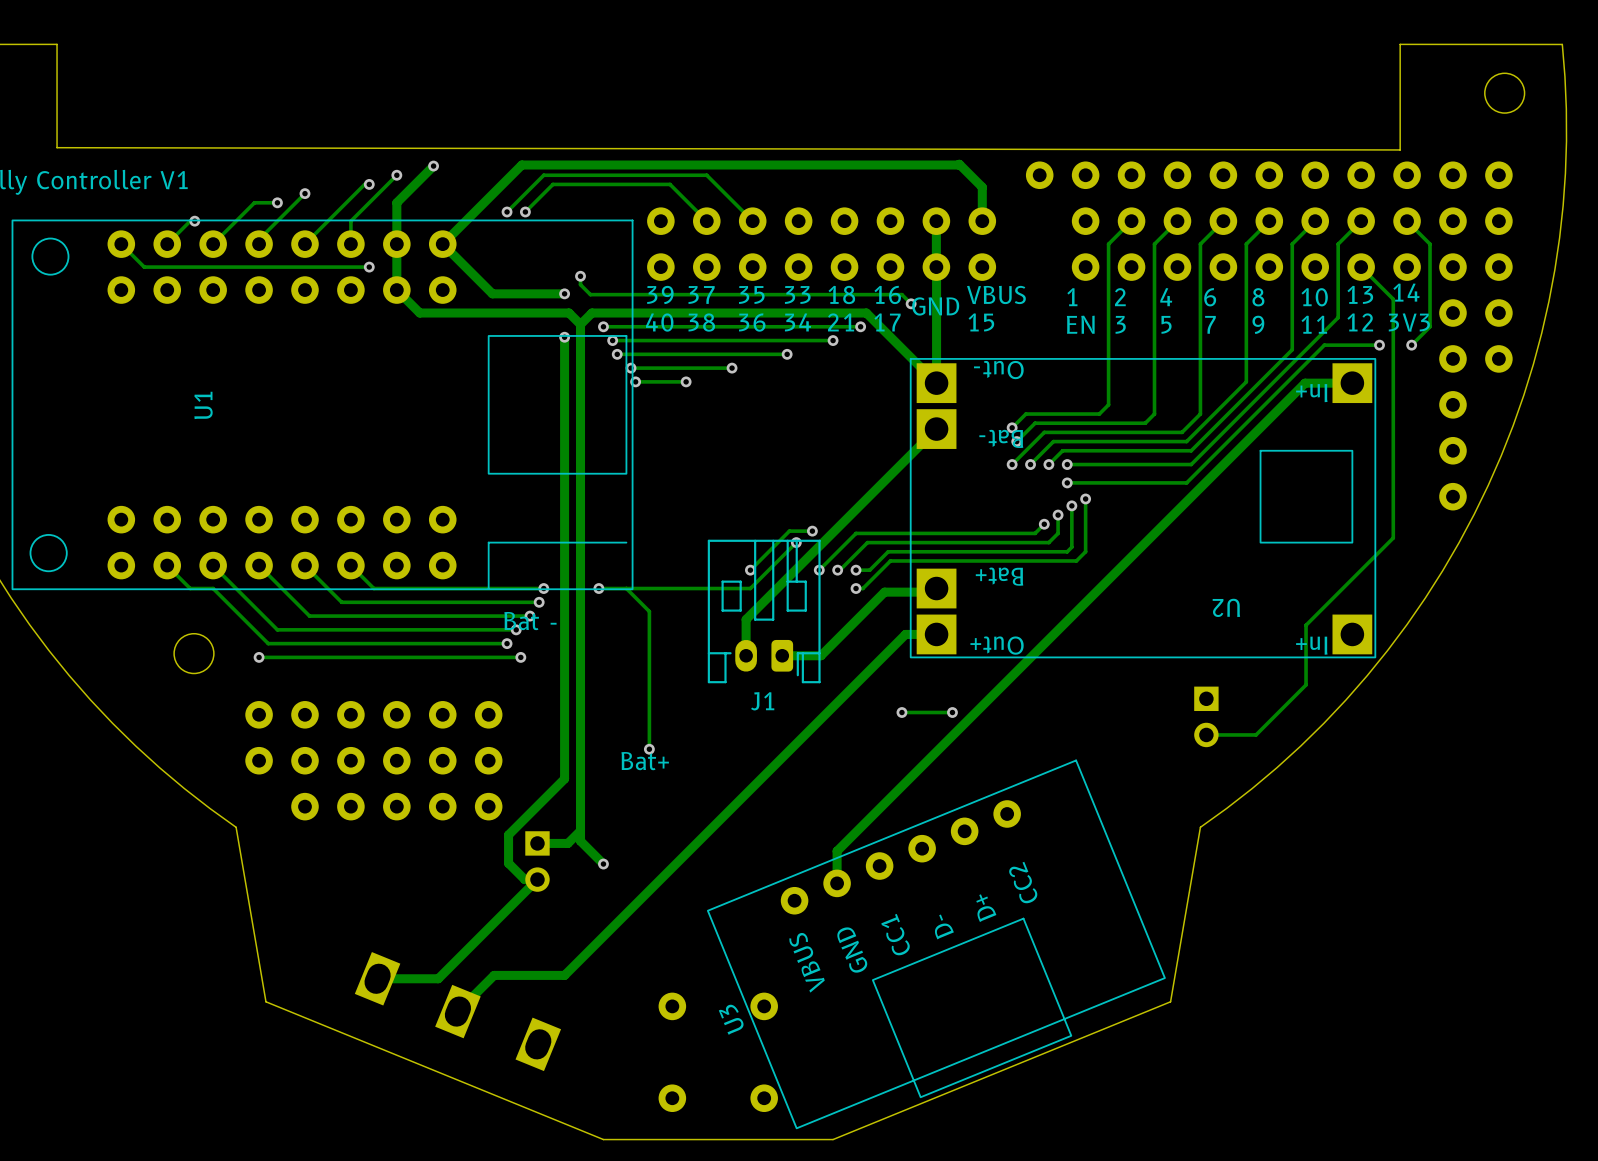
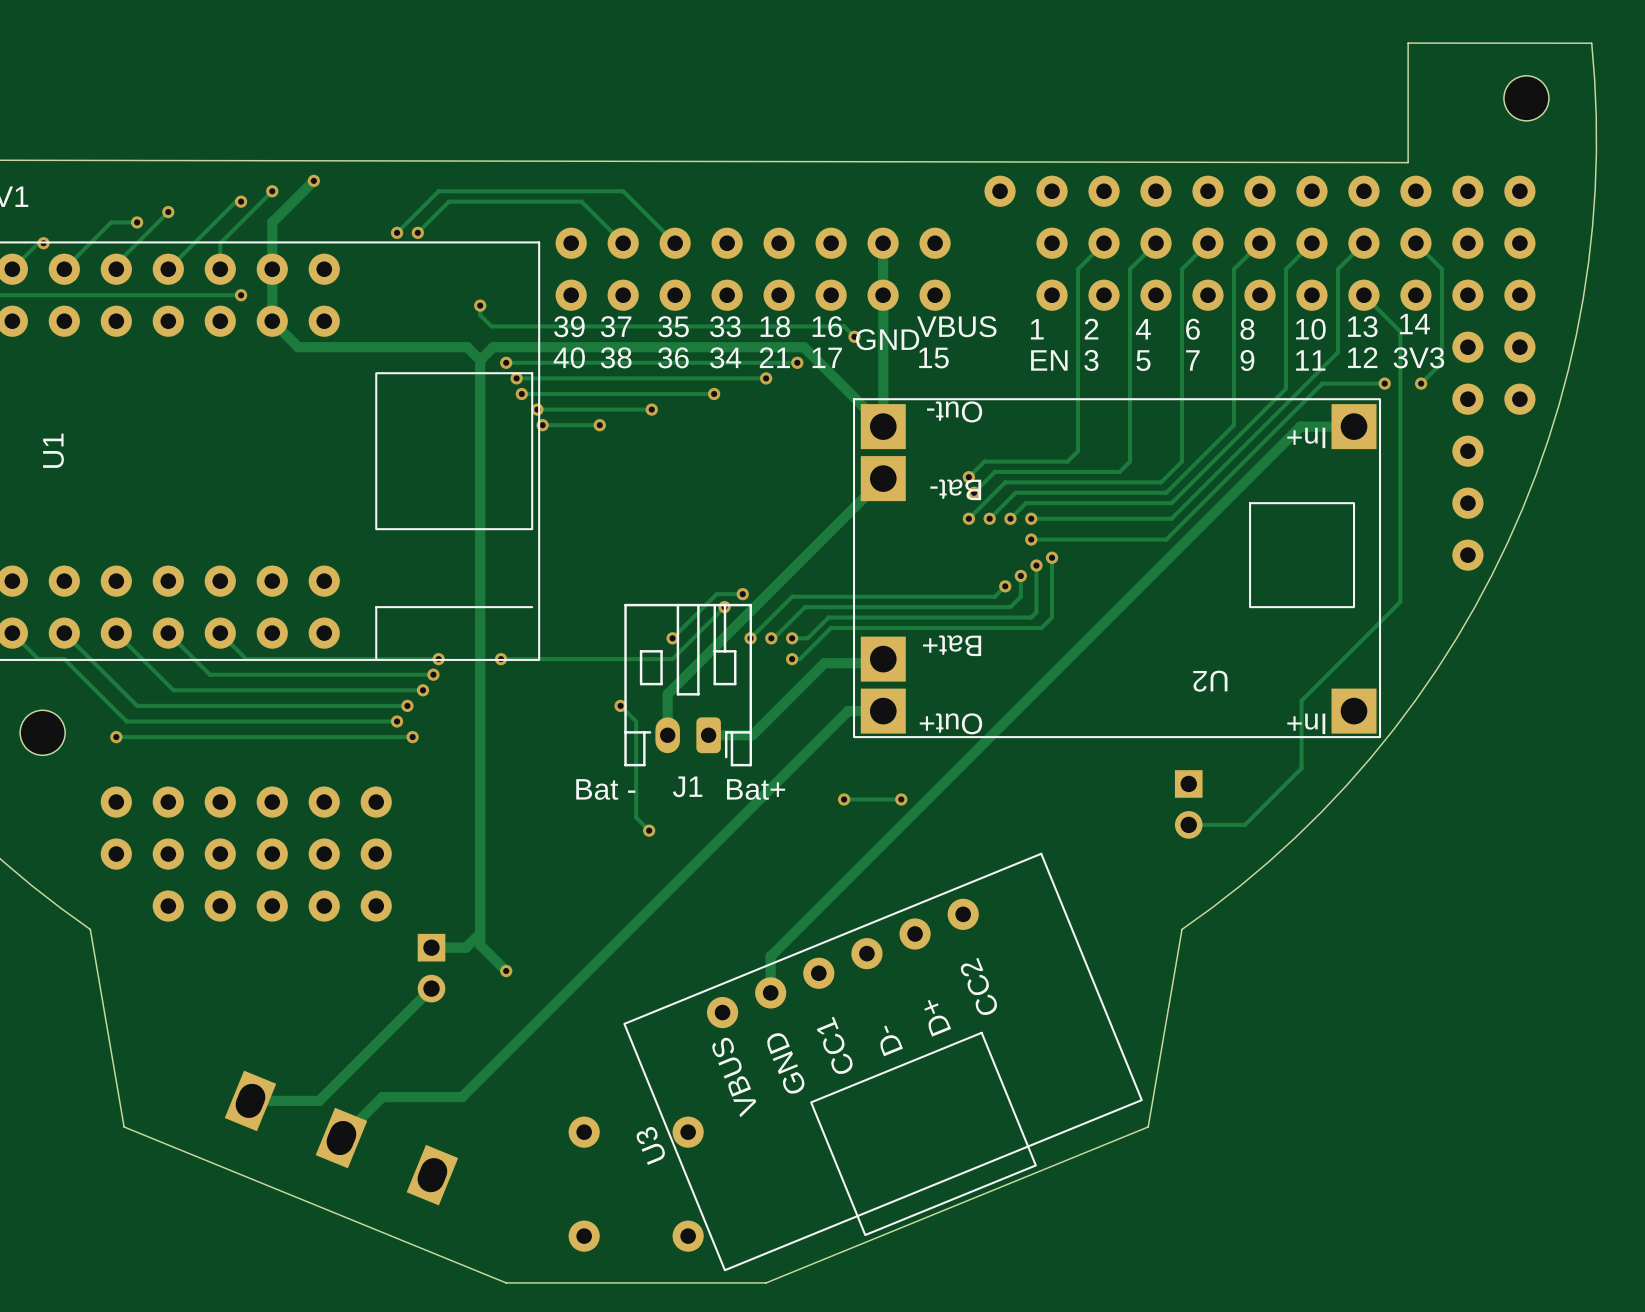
track: (982, 221) (982, 187) (959, 164) (521, 165) (442, 244) (492, 293) (564, 293) -> none
via: (564, 293) -> none
track: (564, 337) (564, 778) (508, 834) (508, 863) (524, 879) (537, 879) -> none
via: (564, 337) -> none
track: (626, 588) (649, 611) (649, 749) -> none
text position: Bat - (530, 621) -> Bat - (605, 789)
track: none -> (620, 705) (636, 721) (636, 817) (649, 830)
via: none -> (620, 705)
via: none -> (649, 830)
via: (649, 749) -> none
text position: Bat+ (645, 761) -> Bat+ (756, 789)

